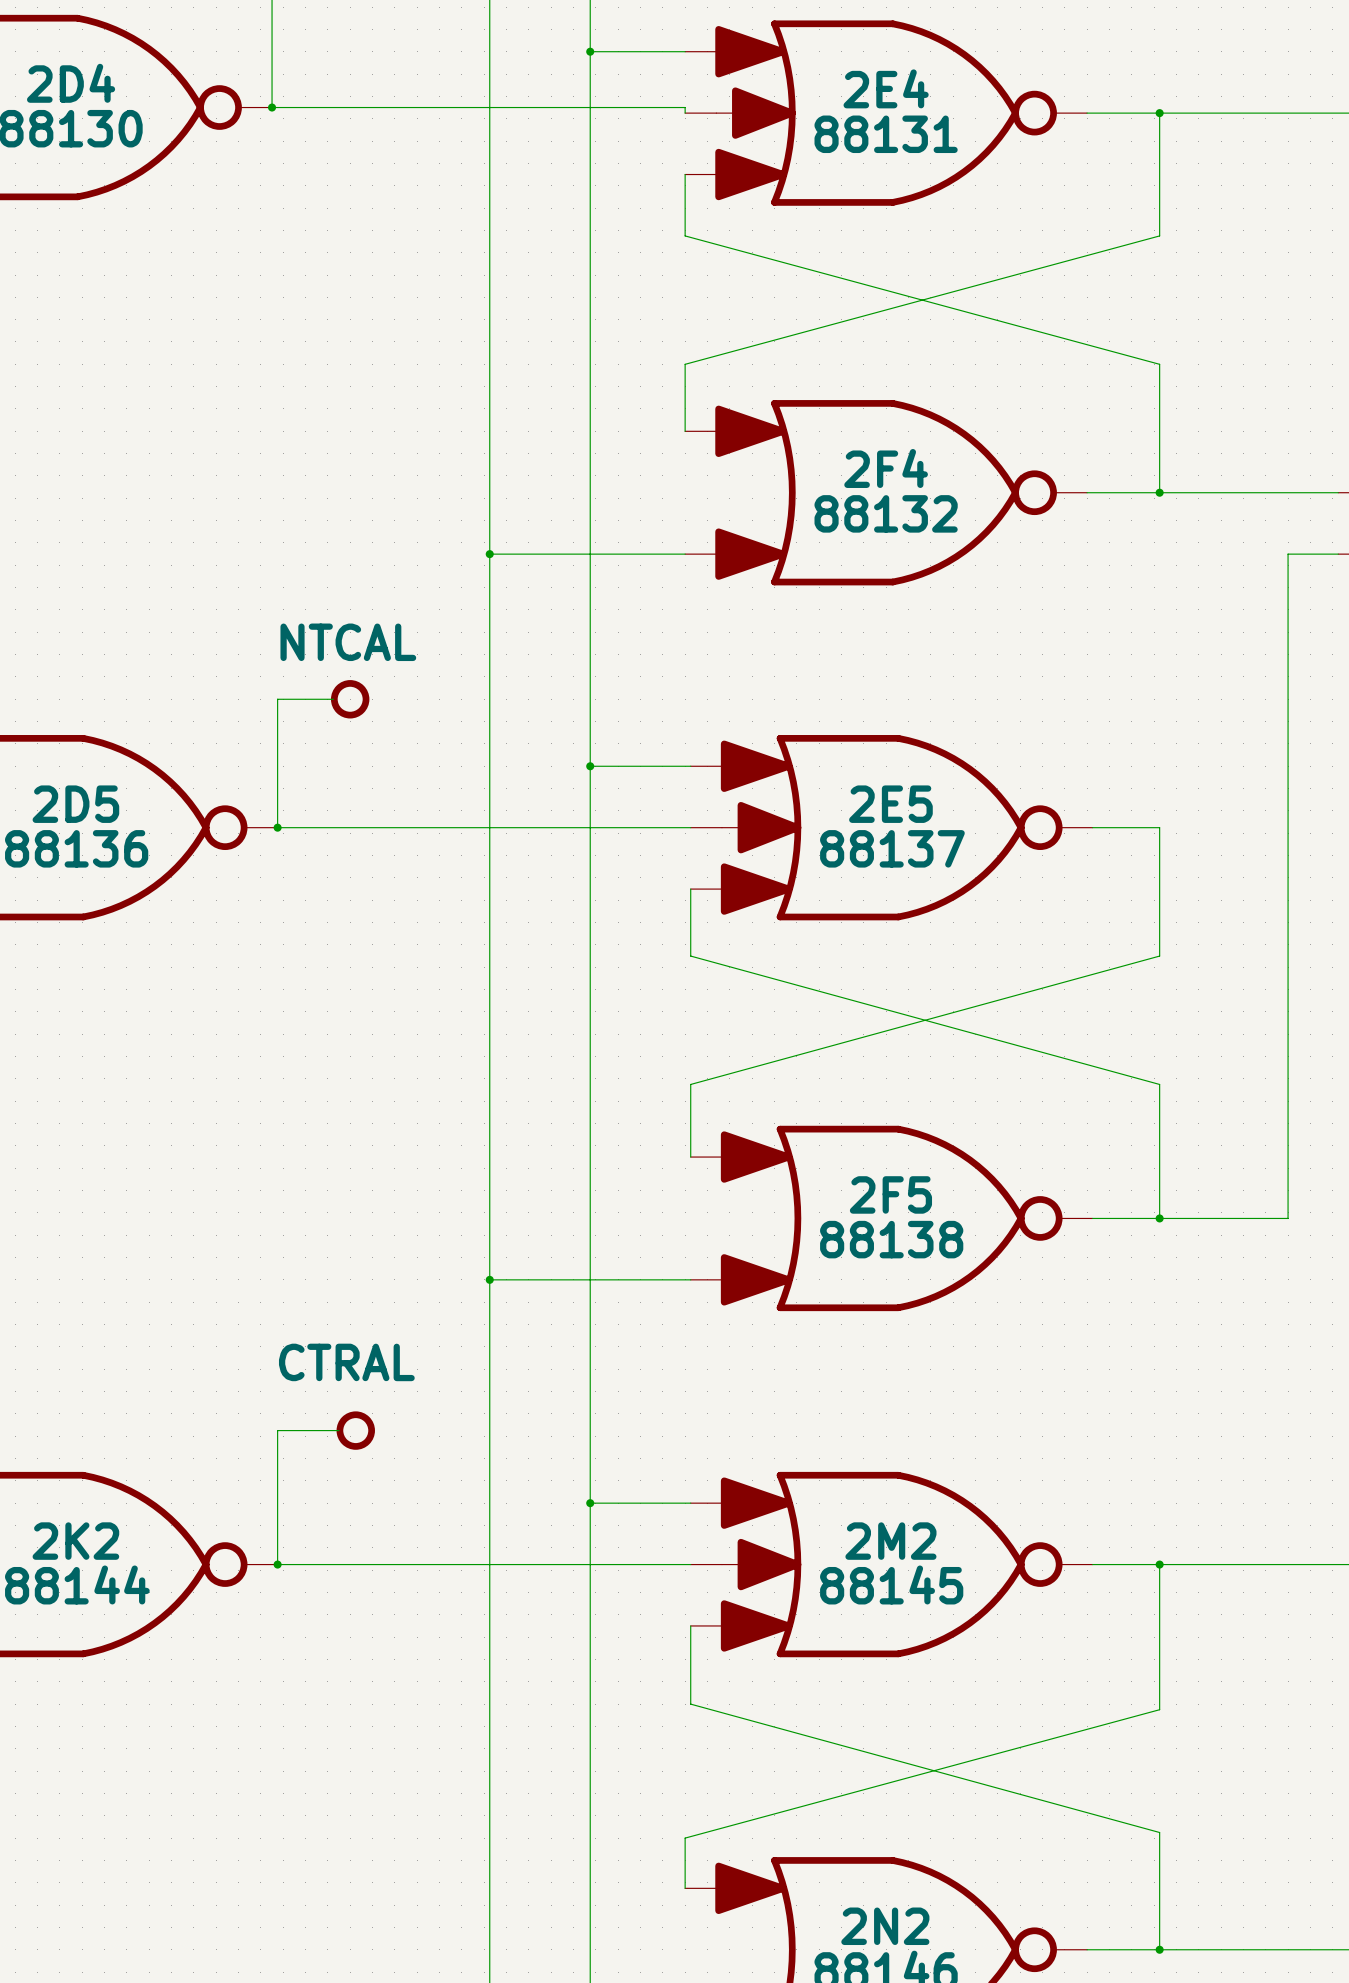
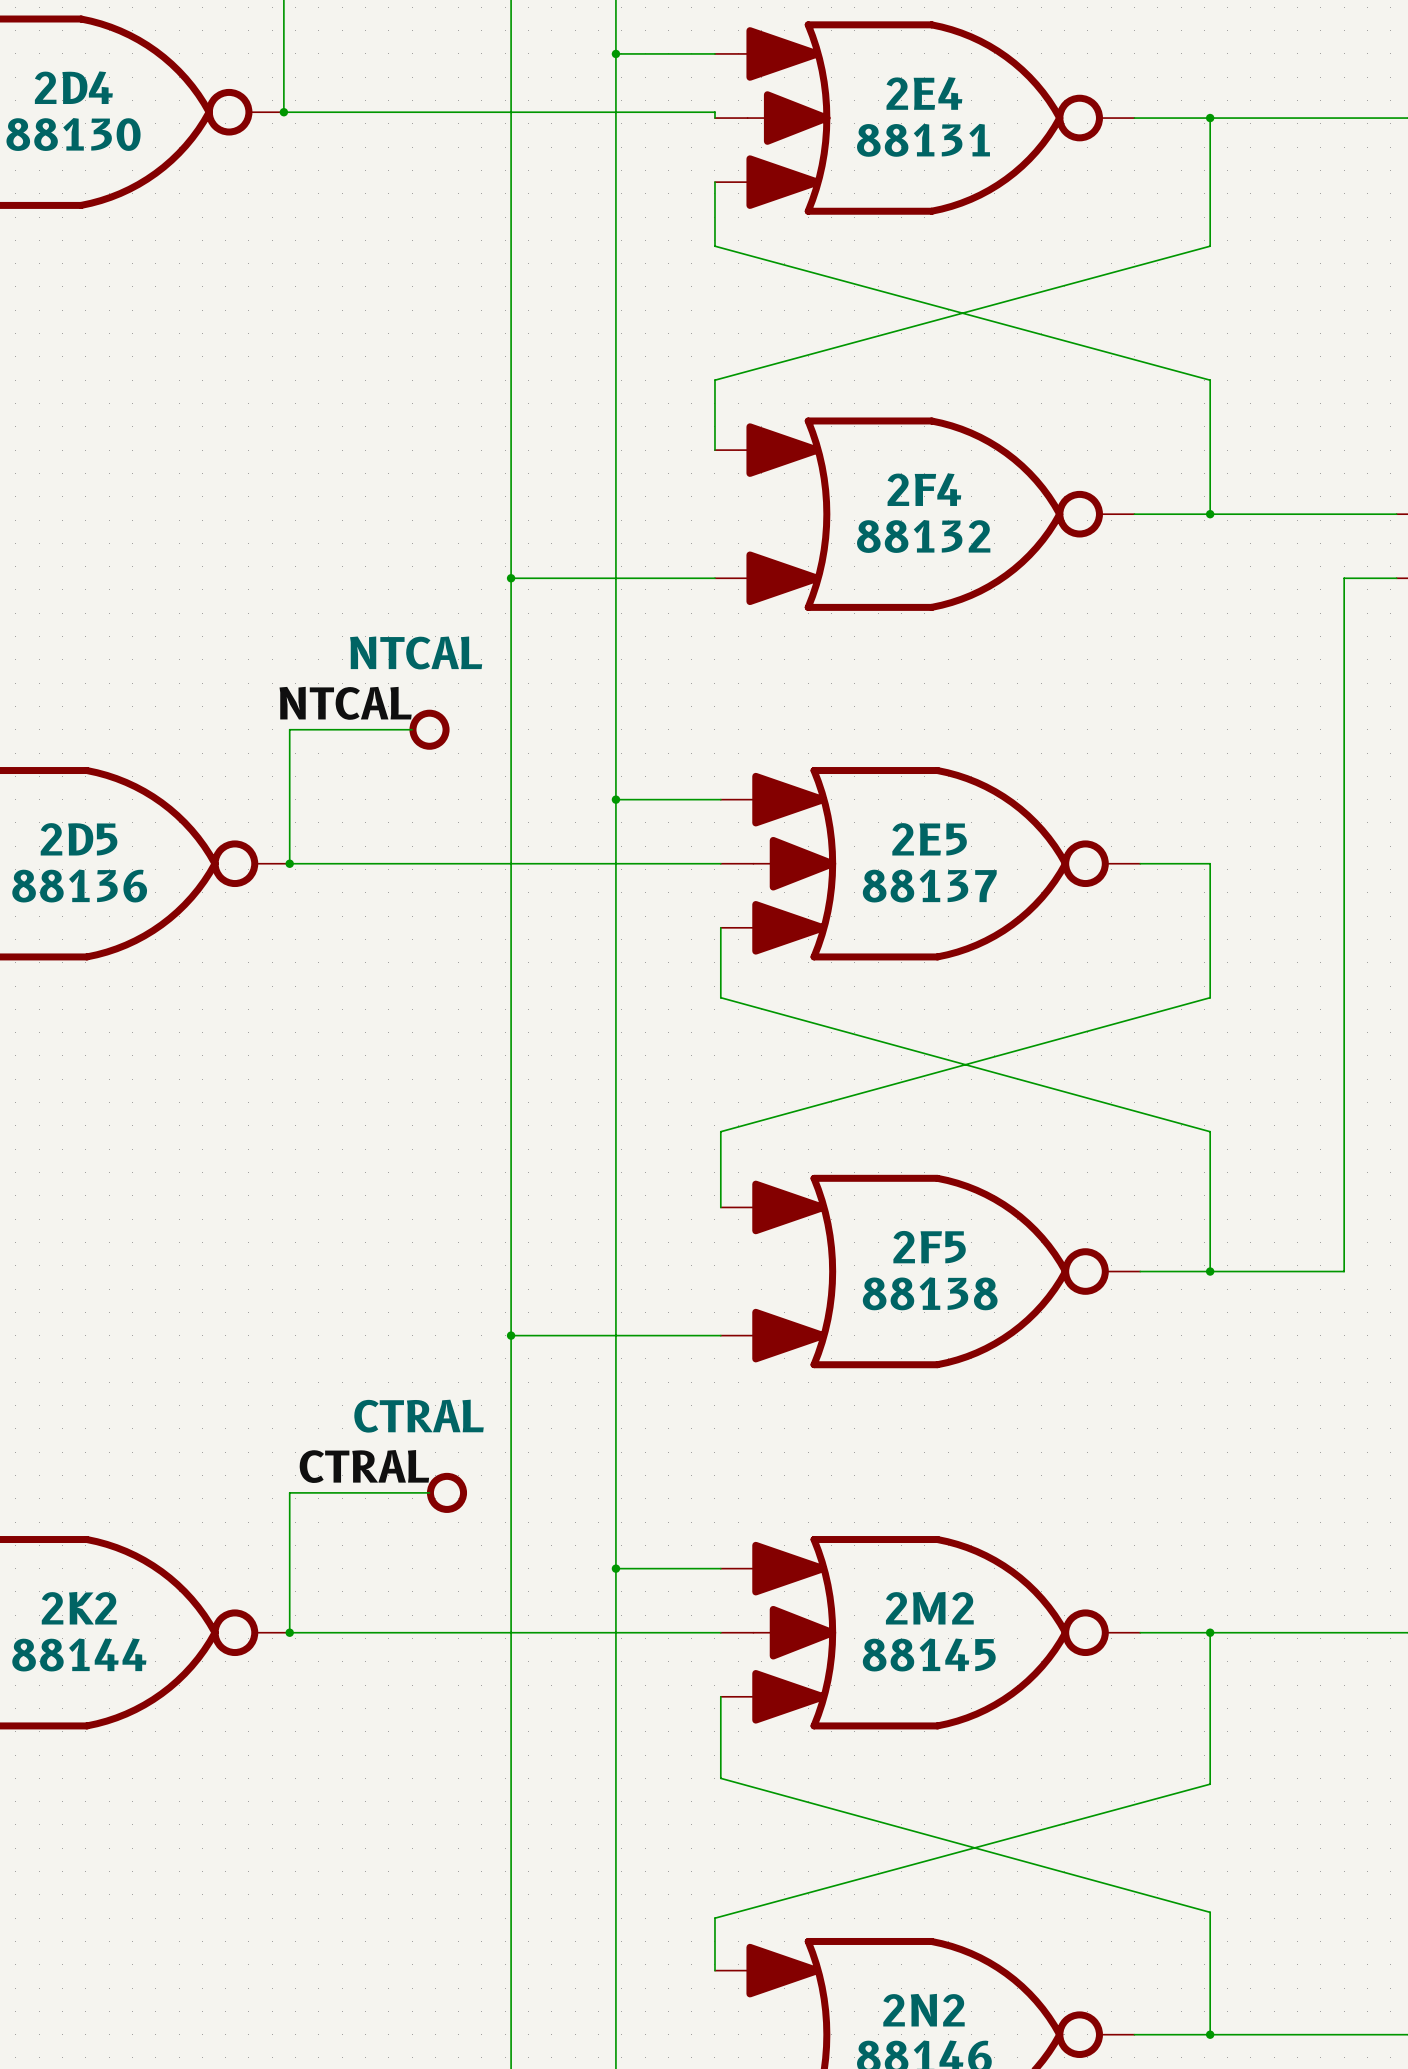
part text position: NTCAL (348, 642) -> NTCAL (416, 652)
label: none -> NTCAL (345, 703)
wire: none -> (347, 729) (412, 729)
part position: (350, 699) -> (429, 729)
part text position: CTRAL (346, 1362) -> CTRAL (419, 1416)
label: none -> CTRAL (364, 1466)
wire: none -> (353, 1492) (429, 1492)
part position: (355, 1430) -> (447, 1492)

